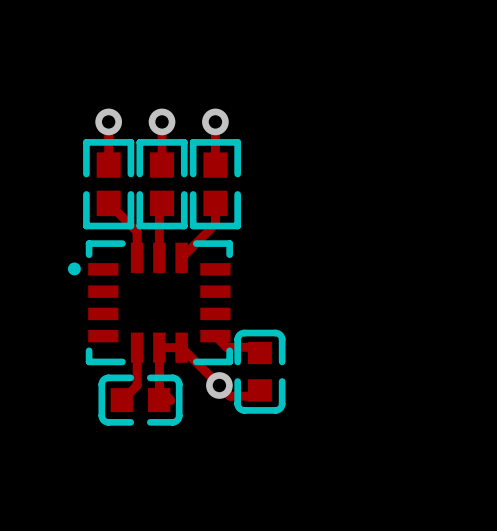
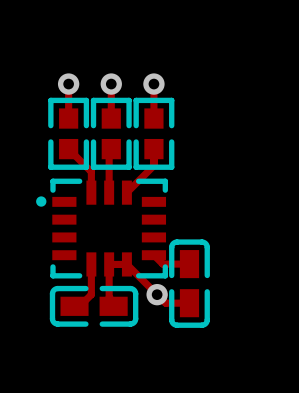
part footprint: [234, 329, 286, 414] -> [169, 239, 210, 328]
part footprint: [98, 374, 183, 426] -> [49, 285, 139, 327]

